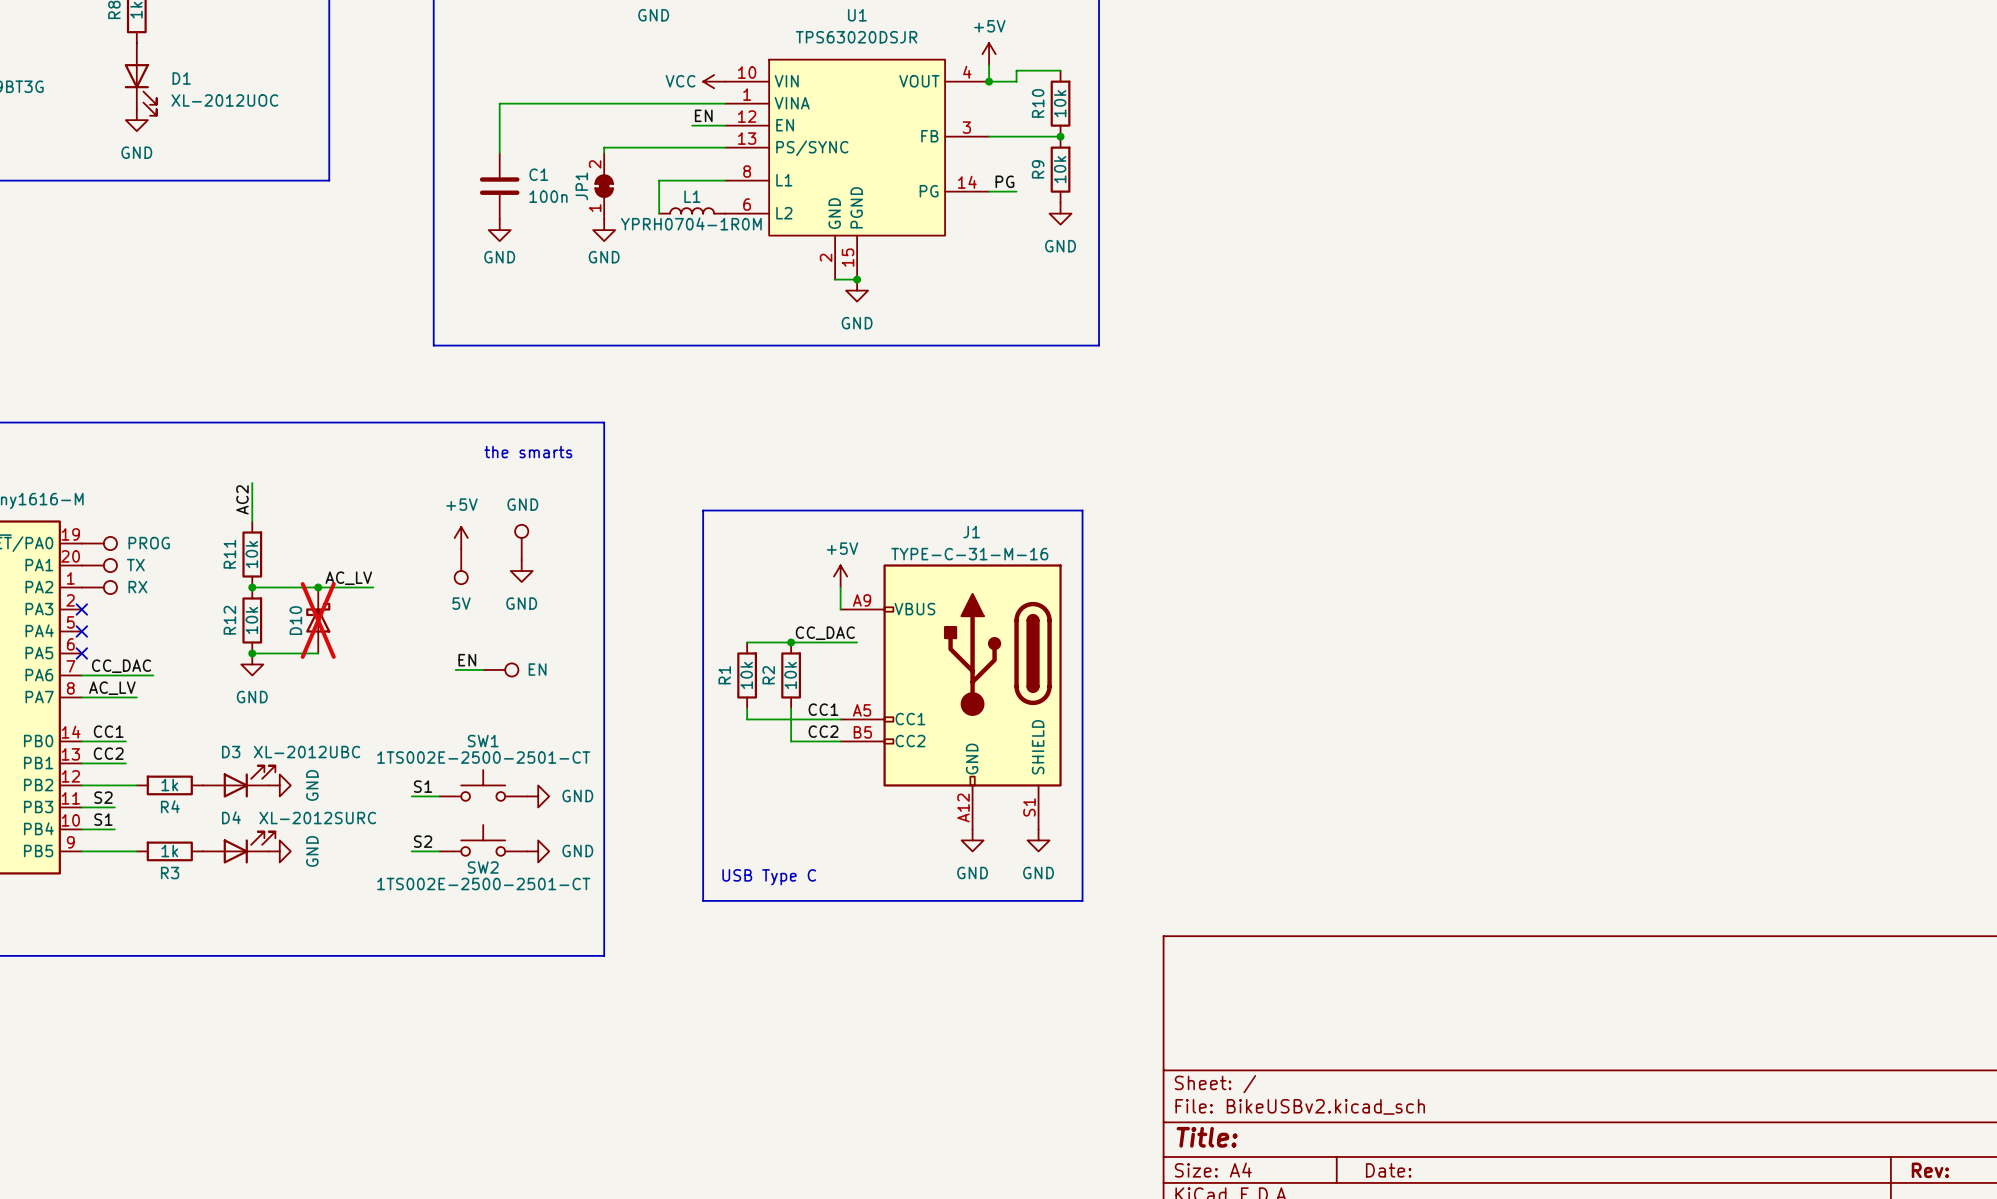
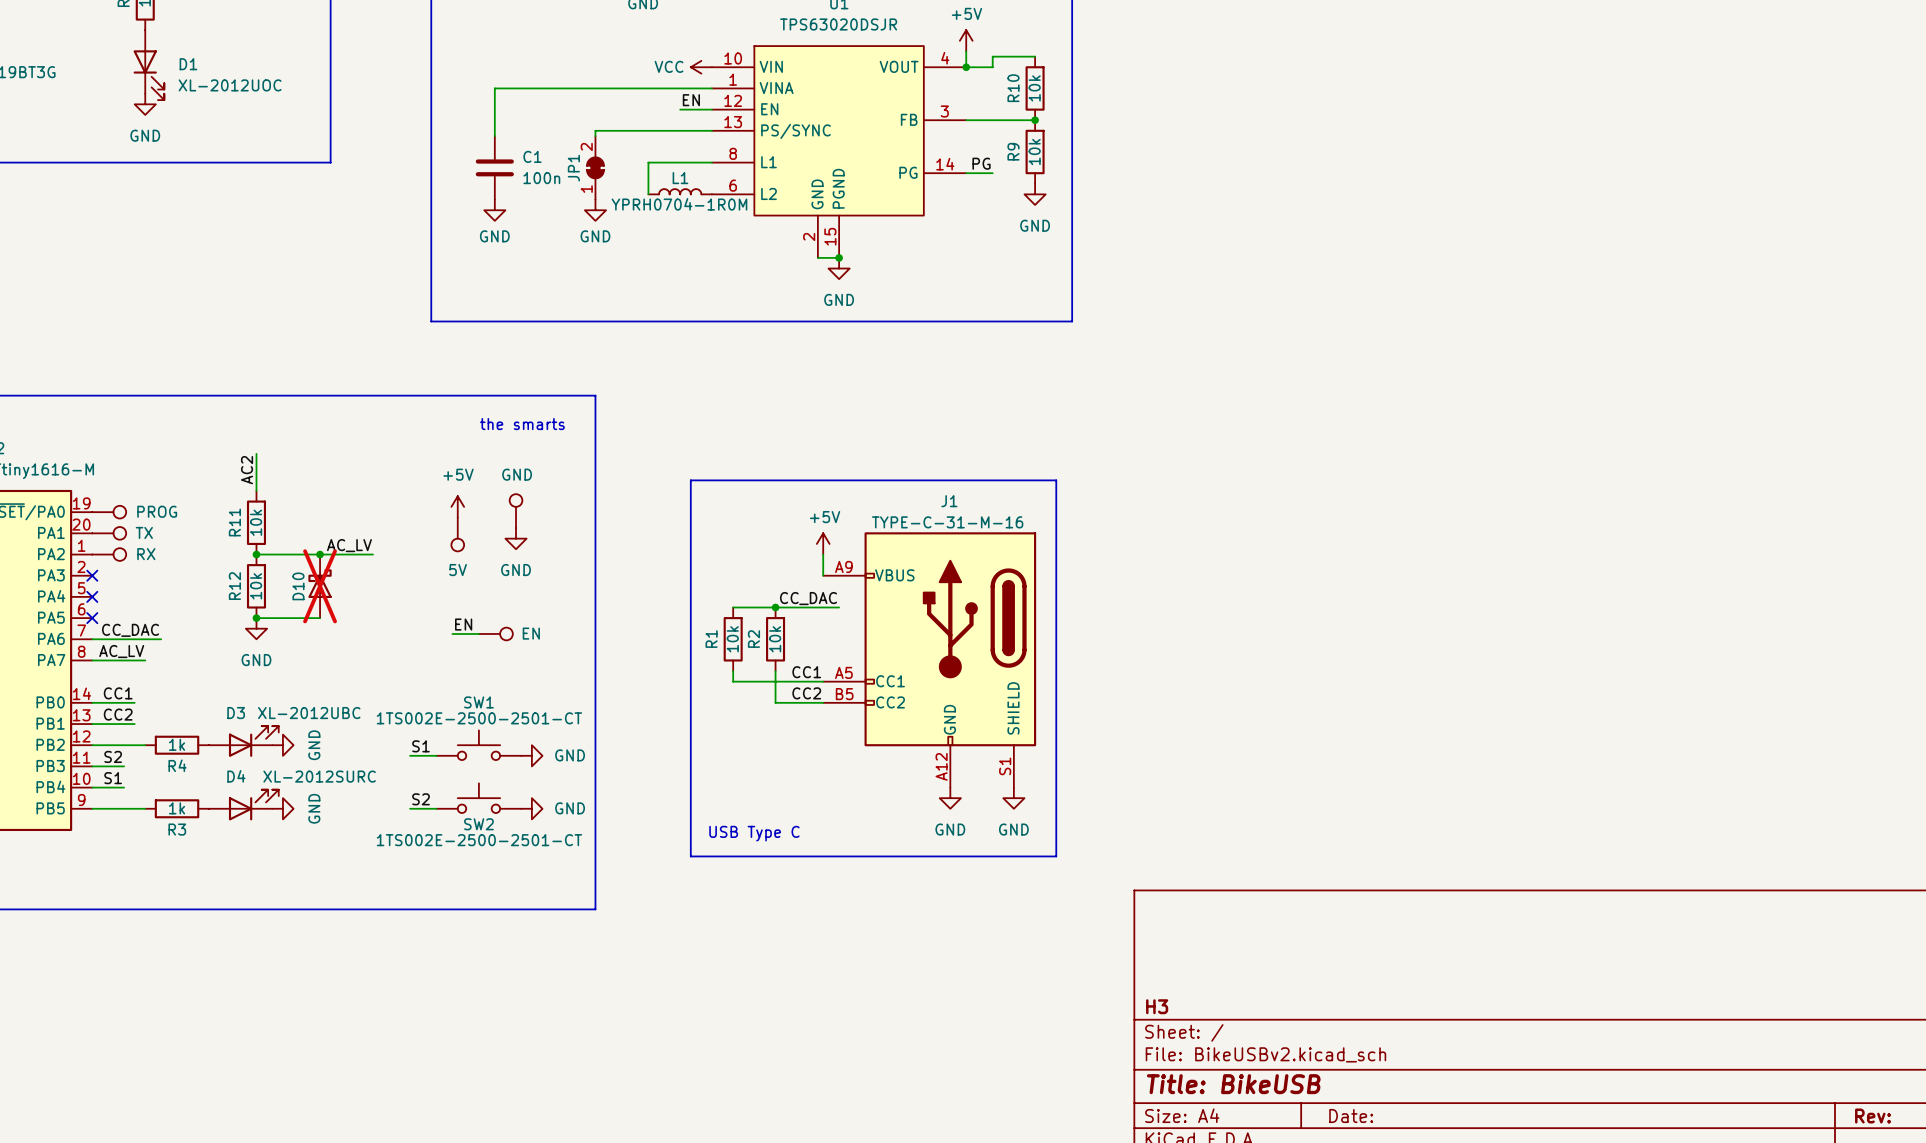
title block: none -> H3 (1157, 1006)
title block: Title: (1207, 1137) -> Title: BikeUSB (1233, 1084)

